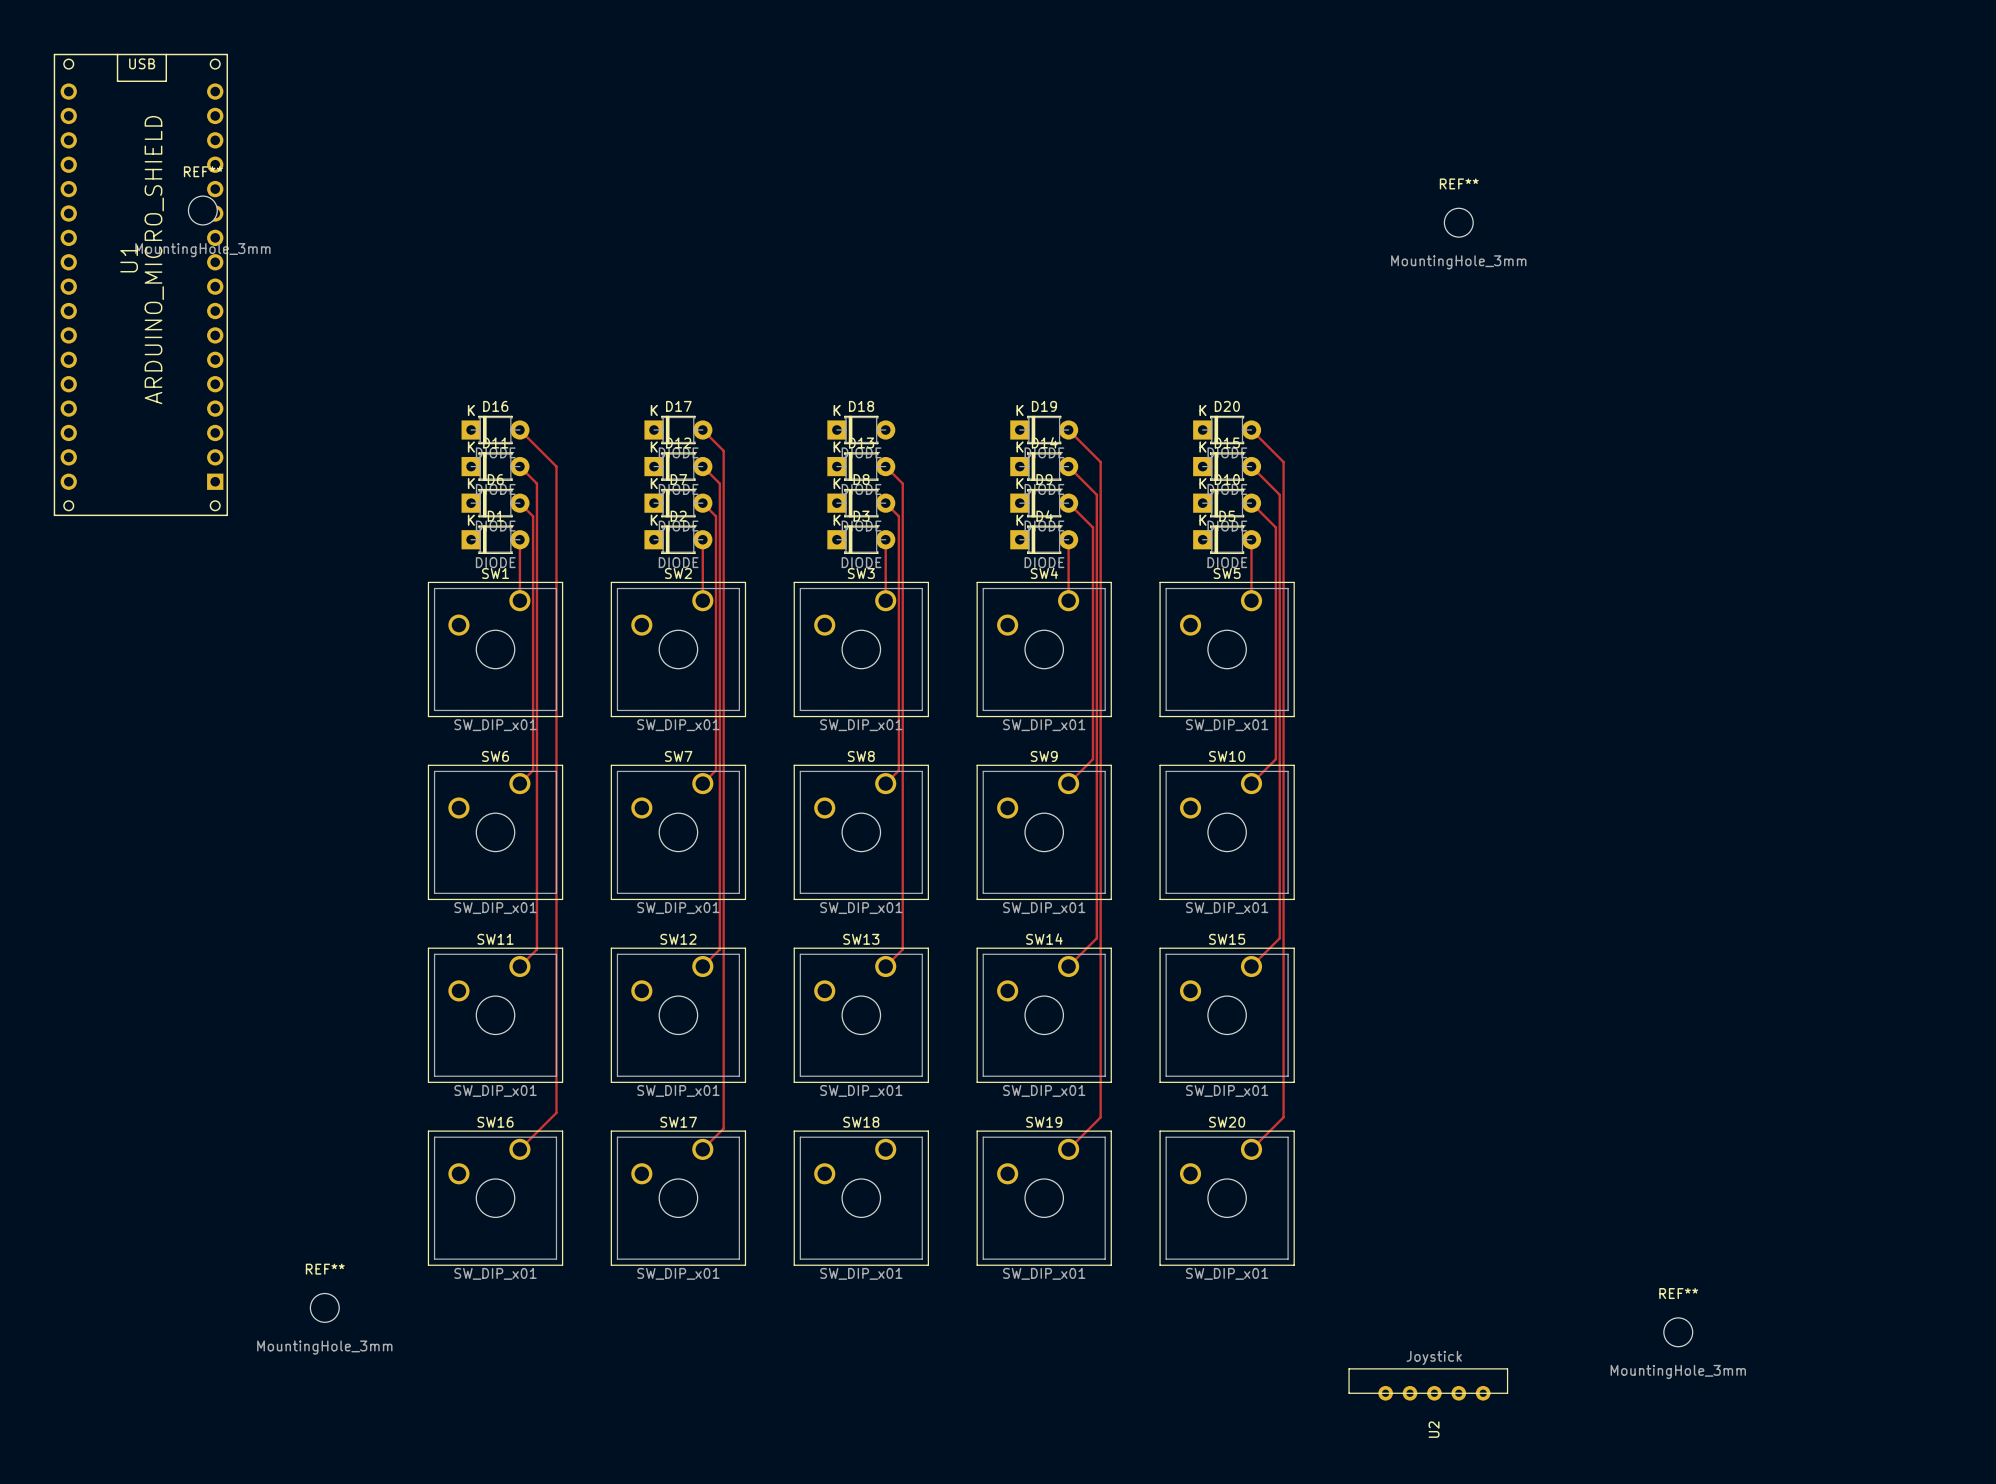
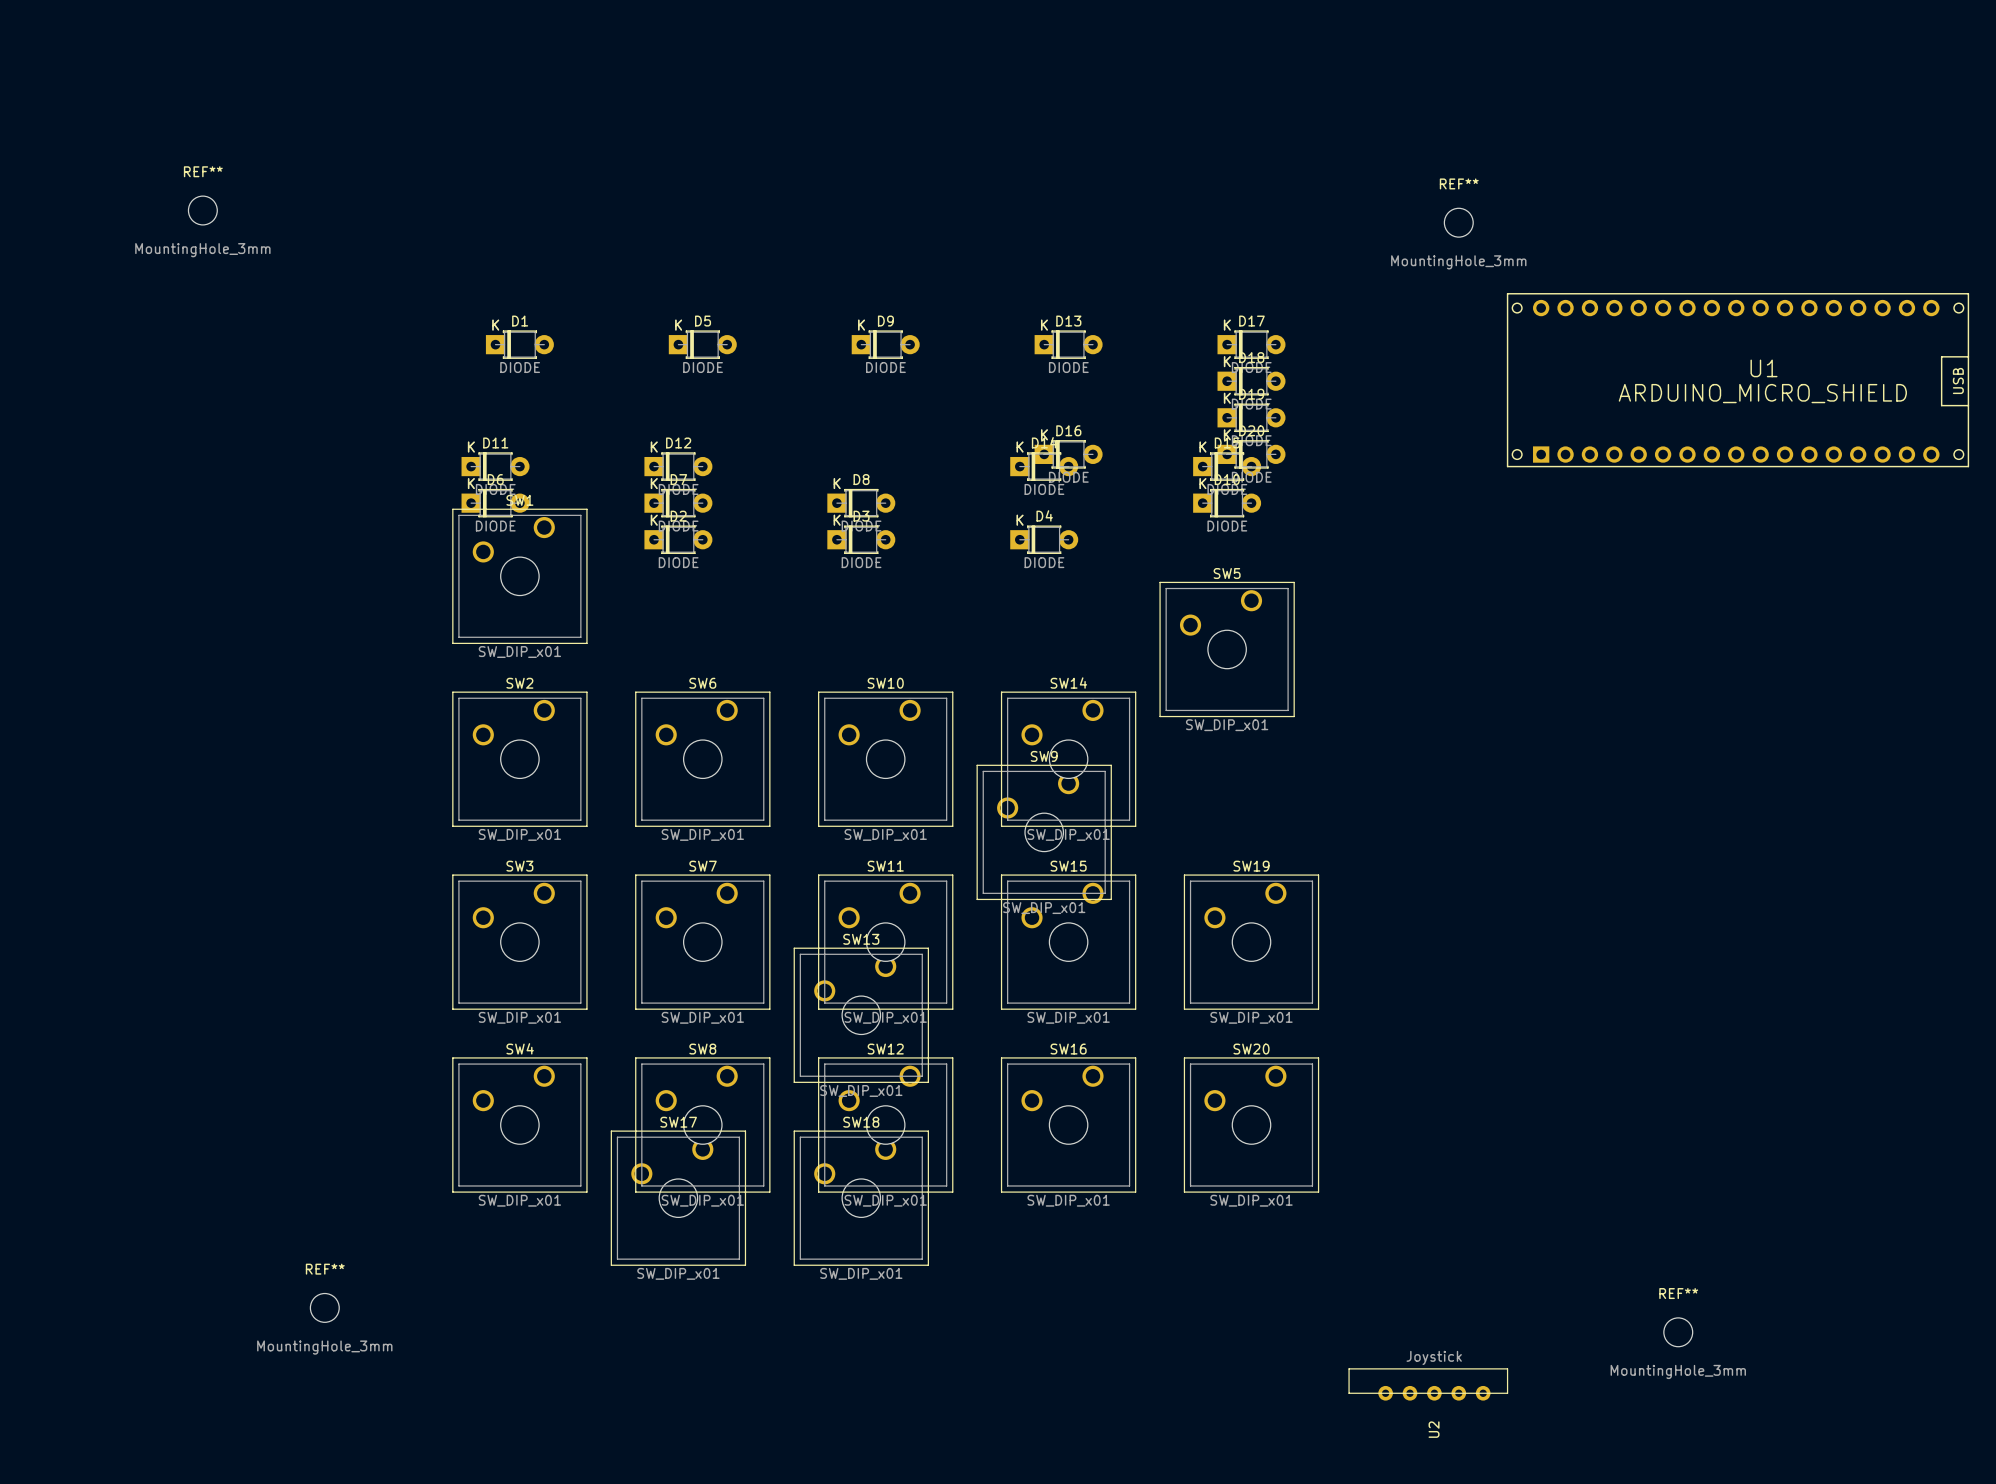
U1 rotation: 0° (140, 284) -> 90° clockwise (1738, 380)
U1 position: (140, 284) -> (1738, 380)
D16 position: (495, 430) -> (1068, 454)
track: (519, 430) (556, 466) (556, 1112) (519, 1149) -> none
D17 position: (678, 430) -> (1251, 344)
track: (702, 430) (723, 450) (723, 1128) (702, 1149) -> none
D18 position: (861, 430) -> (1251, 381)
D19 position: (1044, 430) -> (1251, 417)
track: (1068, 430) (1100, 462) (1100, 1117) (1068, 1149) -> none
D20 position: (1227, 430) -> (1251, 454)
track: (1251, 430) (1283, 462) (1283, 1117) (1251, 1149) -> none
track: (519, 466) (536, 483) (536, 949) (519, 966) -> none
track: (702, 466) (719, 483) (719, 949) (702, 966) -> none
D13 position: (861, 466) -> (1068, 344)
track: (885, 466) (902, 483) (902, 949) (885, 966) -> none
track: (1068, 466) (1096, 494) (1096, 938) (1068, 966) -> none
track: (1251, 466) (1279, 494) (1279, 938) (1251, 966) -> none
track: (519, 503) (533, 516) (533, 770) (519, 783) -> none
track: (702, 503) (716, 516) (716, 770) (702, 783) -> none
track: (885, 503) (898, 516) (898, 770) (885, 783) -> none
D9 position: (1044, 503) -> (885, 344)
track: (1068, 503) (1092, 527) (1092, 759) (1068, 783) -> none
track: (1251, 503) (1275, 527) (1275, 759) (1251, 783) -> none
D1 position: (495, 539) -> (519, 344)
track: (519, 539) (519, 600) -> none
track: (702, 539) (702, 600) -> none
track: (885, 539) (885, 600) -> none
track: (1068, 539) (1068, 600) -> none
D5 position: (1227, 539) -> (702, 344)
track: (1251, 539) (1251, 600) -> none
SW1 position: (495, 649) -> (519, 576)
SW2 position: (678, 649) -> (519, 759)
SW3 position: (861, 649) -> (519, 942)
SW4 position: (1044, 649) -> (519, 1125)
SW6 position: (495, 832) -> (702, 759)
SW7 position: (678, 832) -> (702, 942)
SW8 position: (861, 832) -> (702, 1125)
SW10 position: (1227, 832) -> (885, 759)
SW11 position: (495, 1015) -> (885, 942)
SW12 position: (678, 1015) -> (885, 1125)
SW14 position: (1044, 1015) -> (1068, 759)
SW15 position: (1227, 1015) -> (1068, 942)
SW16 position: (495, 1198) -> (1068, 1125)
SW19 position: (1044, 1198) -> (1251, 942)
SW20 position: (1227, 1198) -> (1251, 1125)

